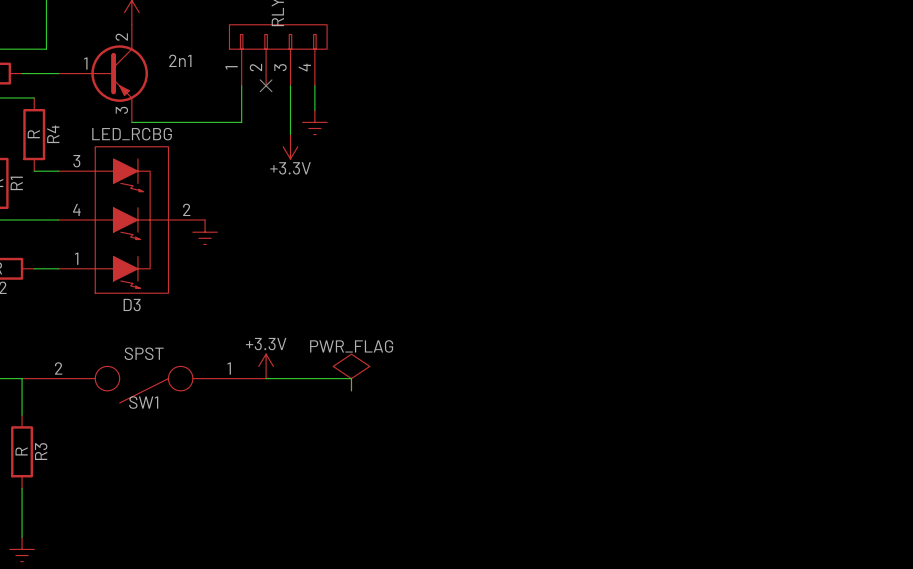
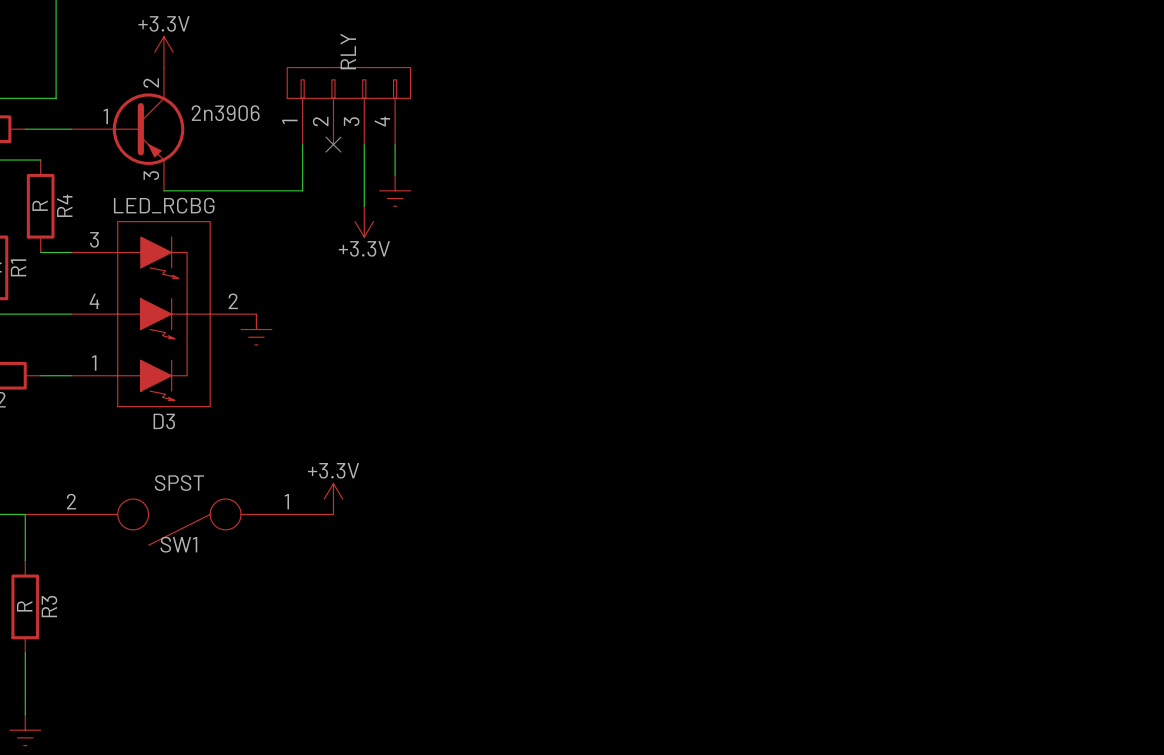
2n1 name: 2n1 (180, 60) -> 2n3906 (225, 113)
power symbol: PWR_FLAG (351, 372) -> none
wire: (266, 378) (351, 378) (351, 390) -> none

